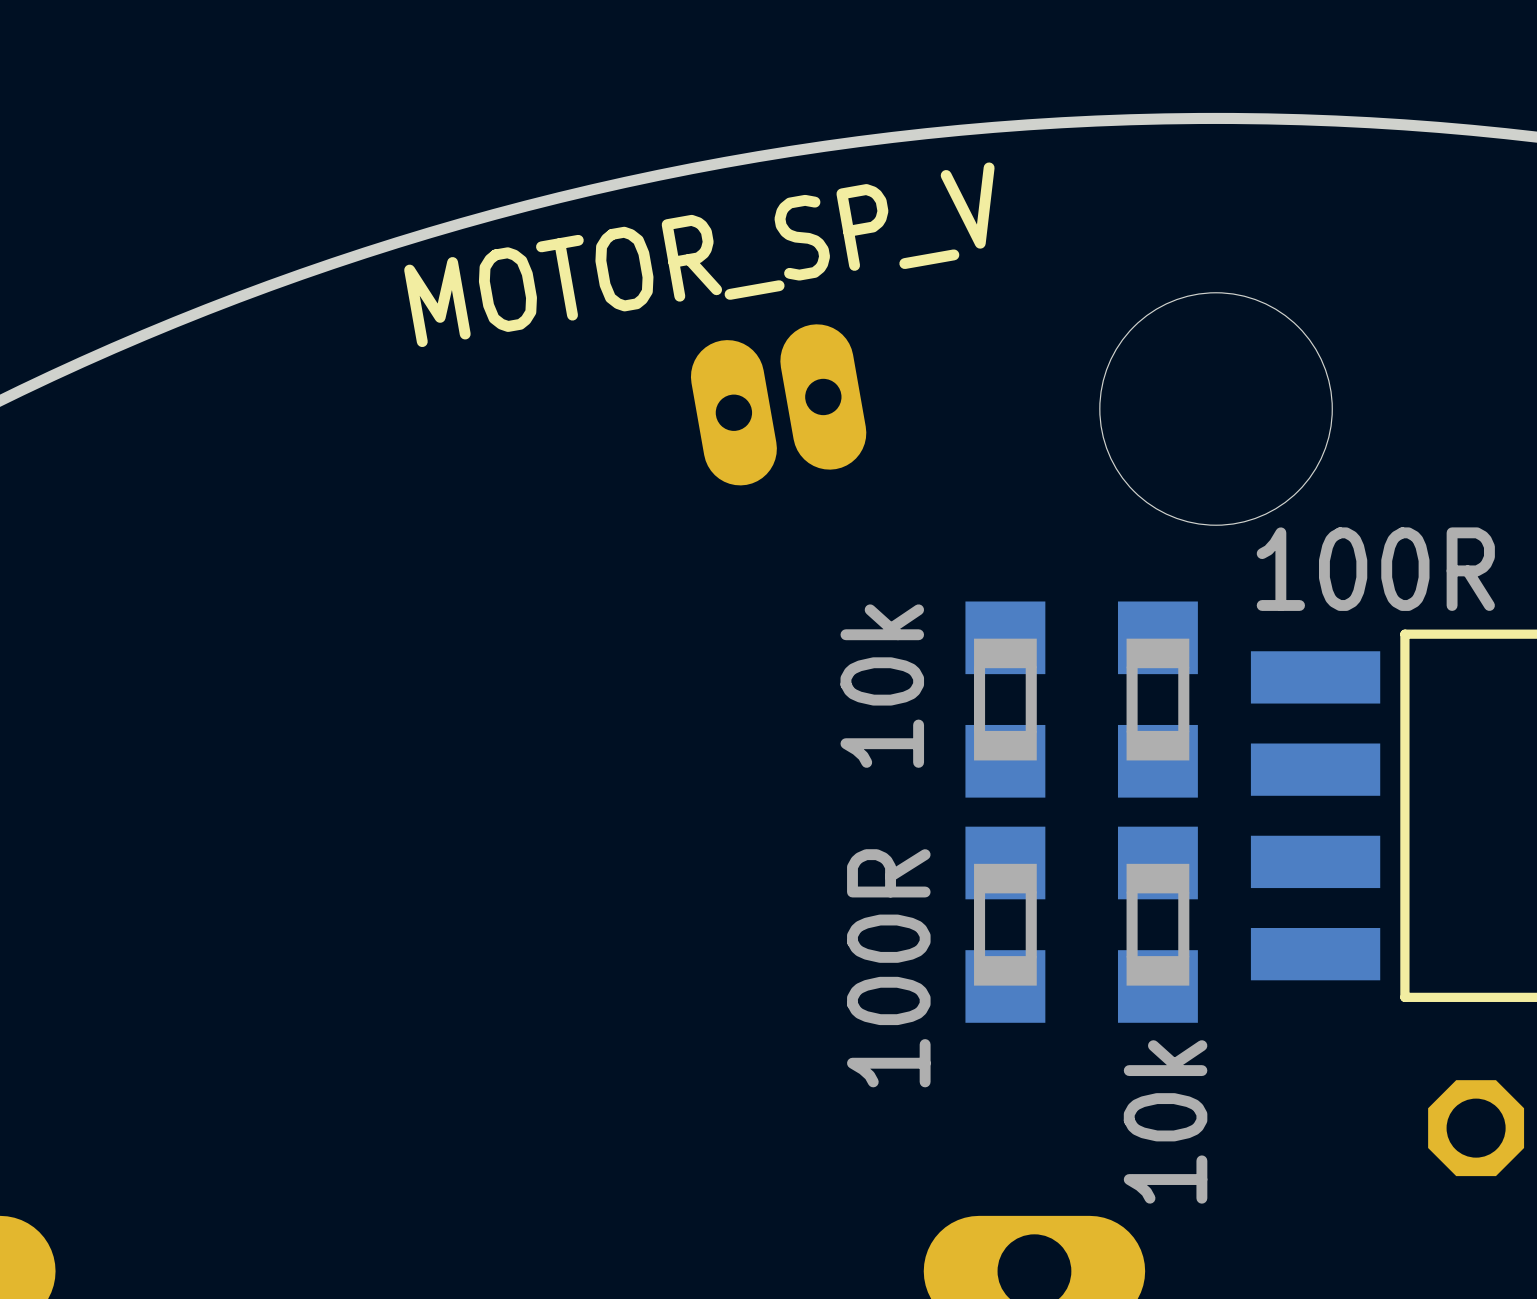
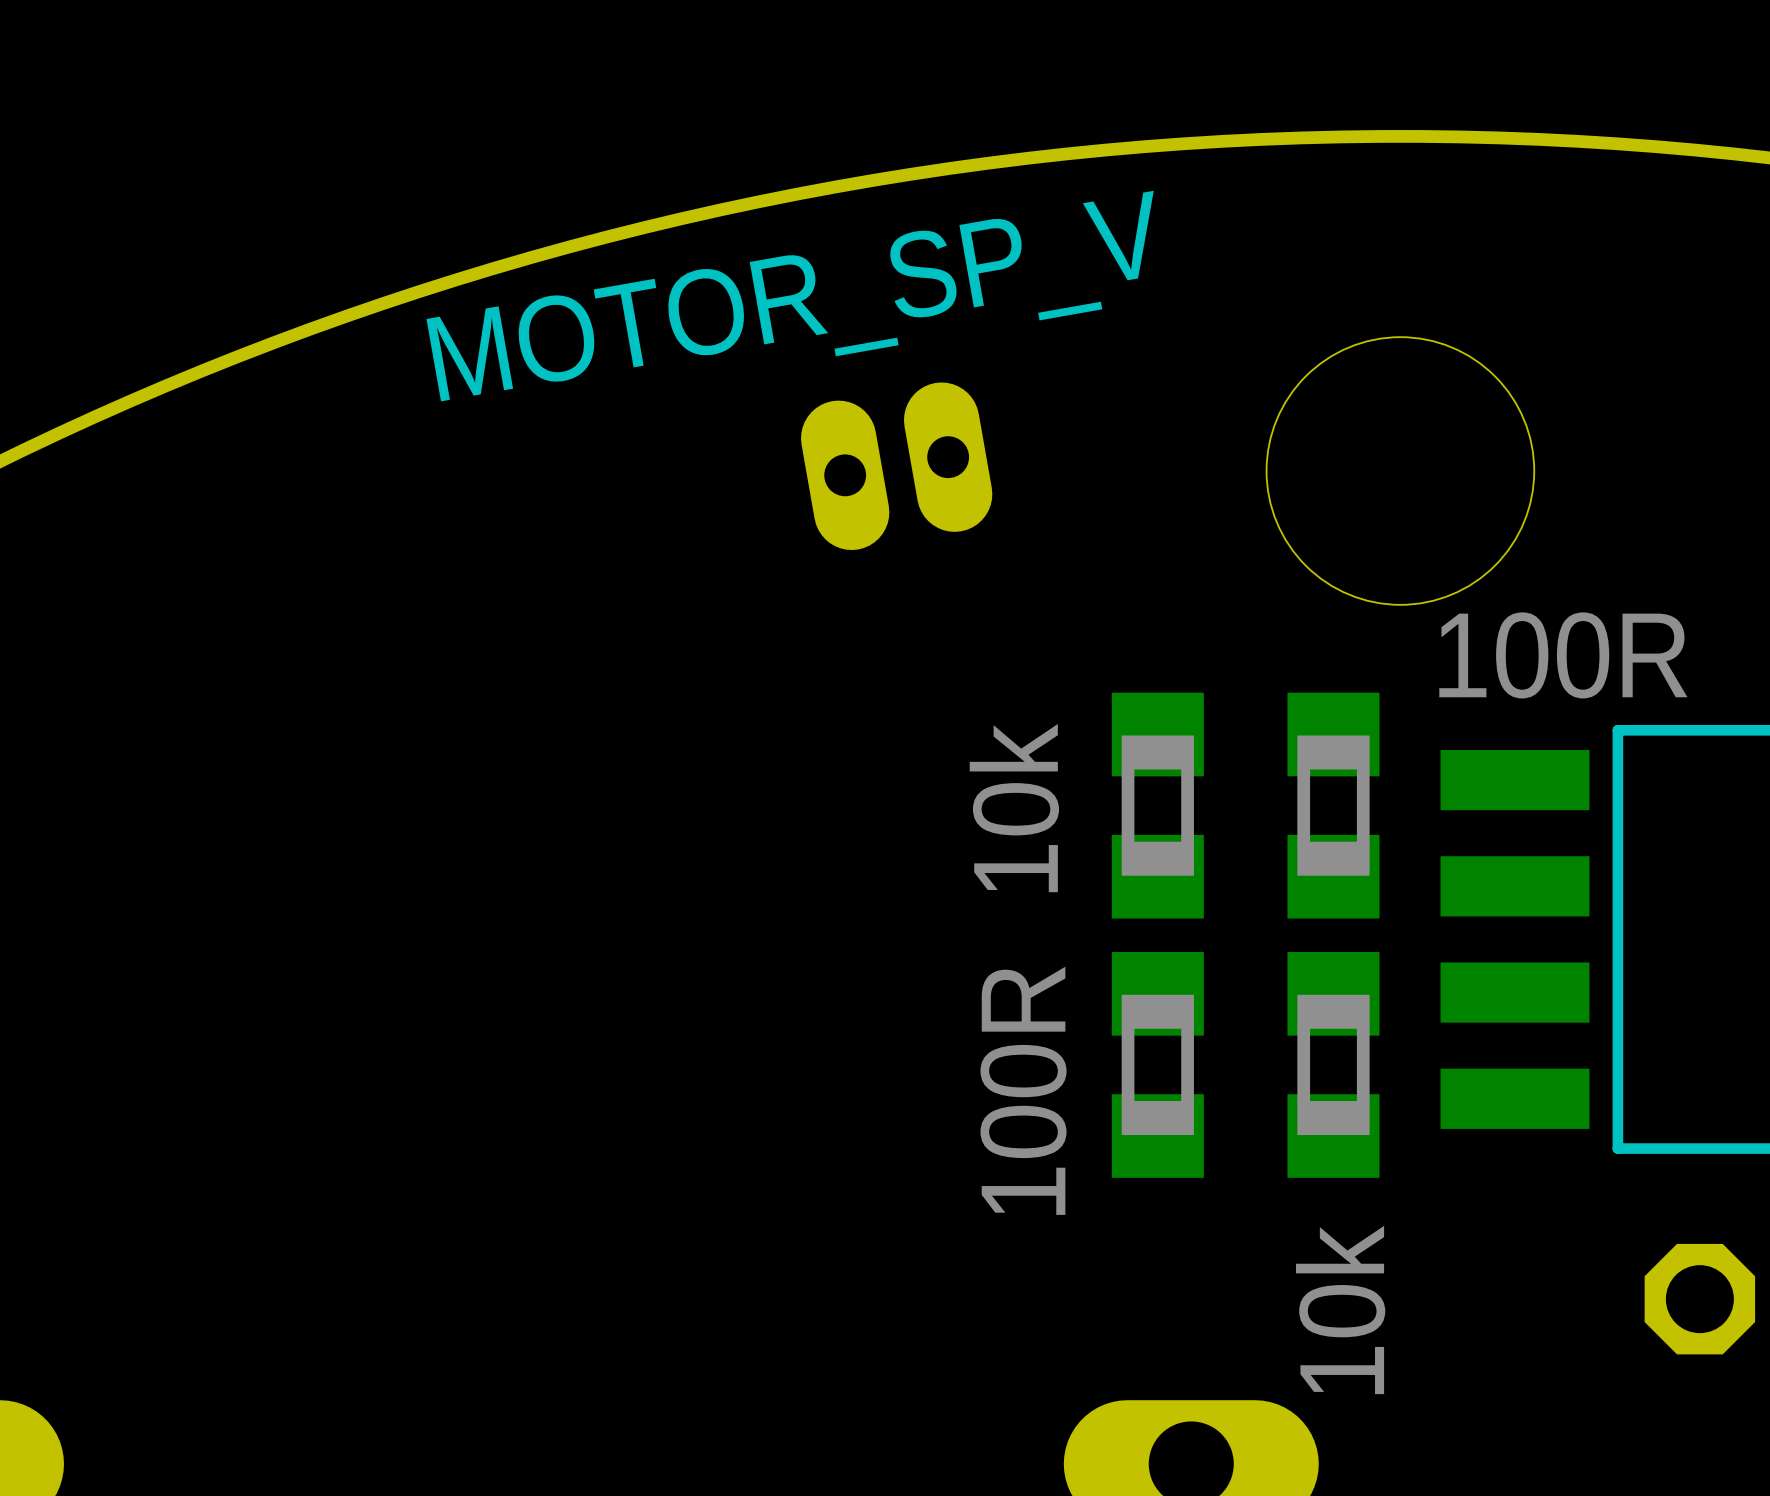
MOTOR_SP_V footprint: [690, 324, 867, 486] -> [801, 382, 993, 551]

